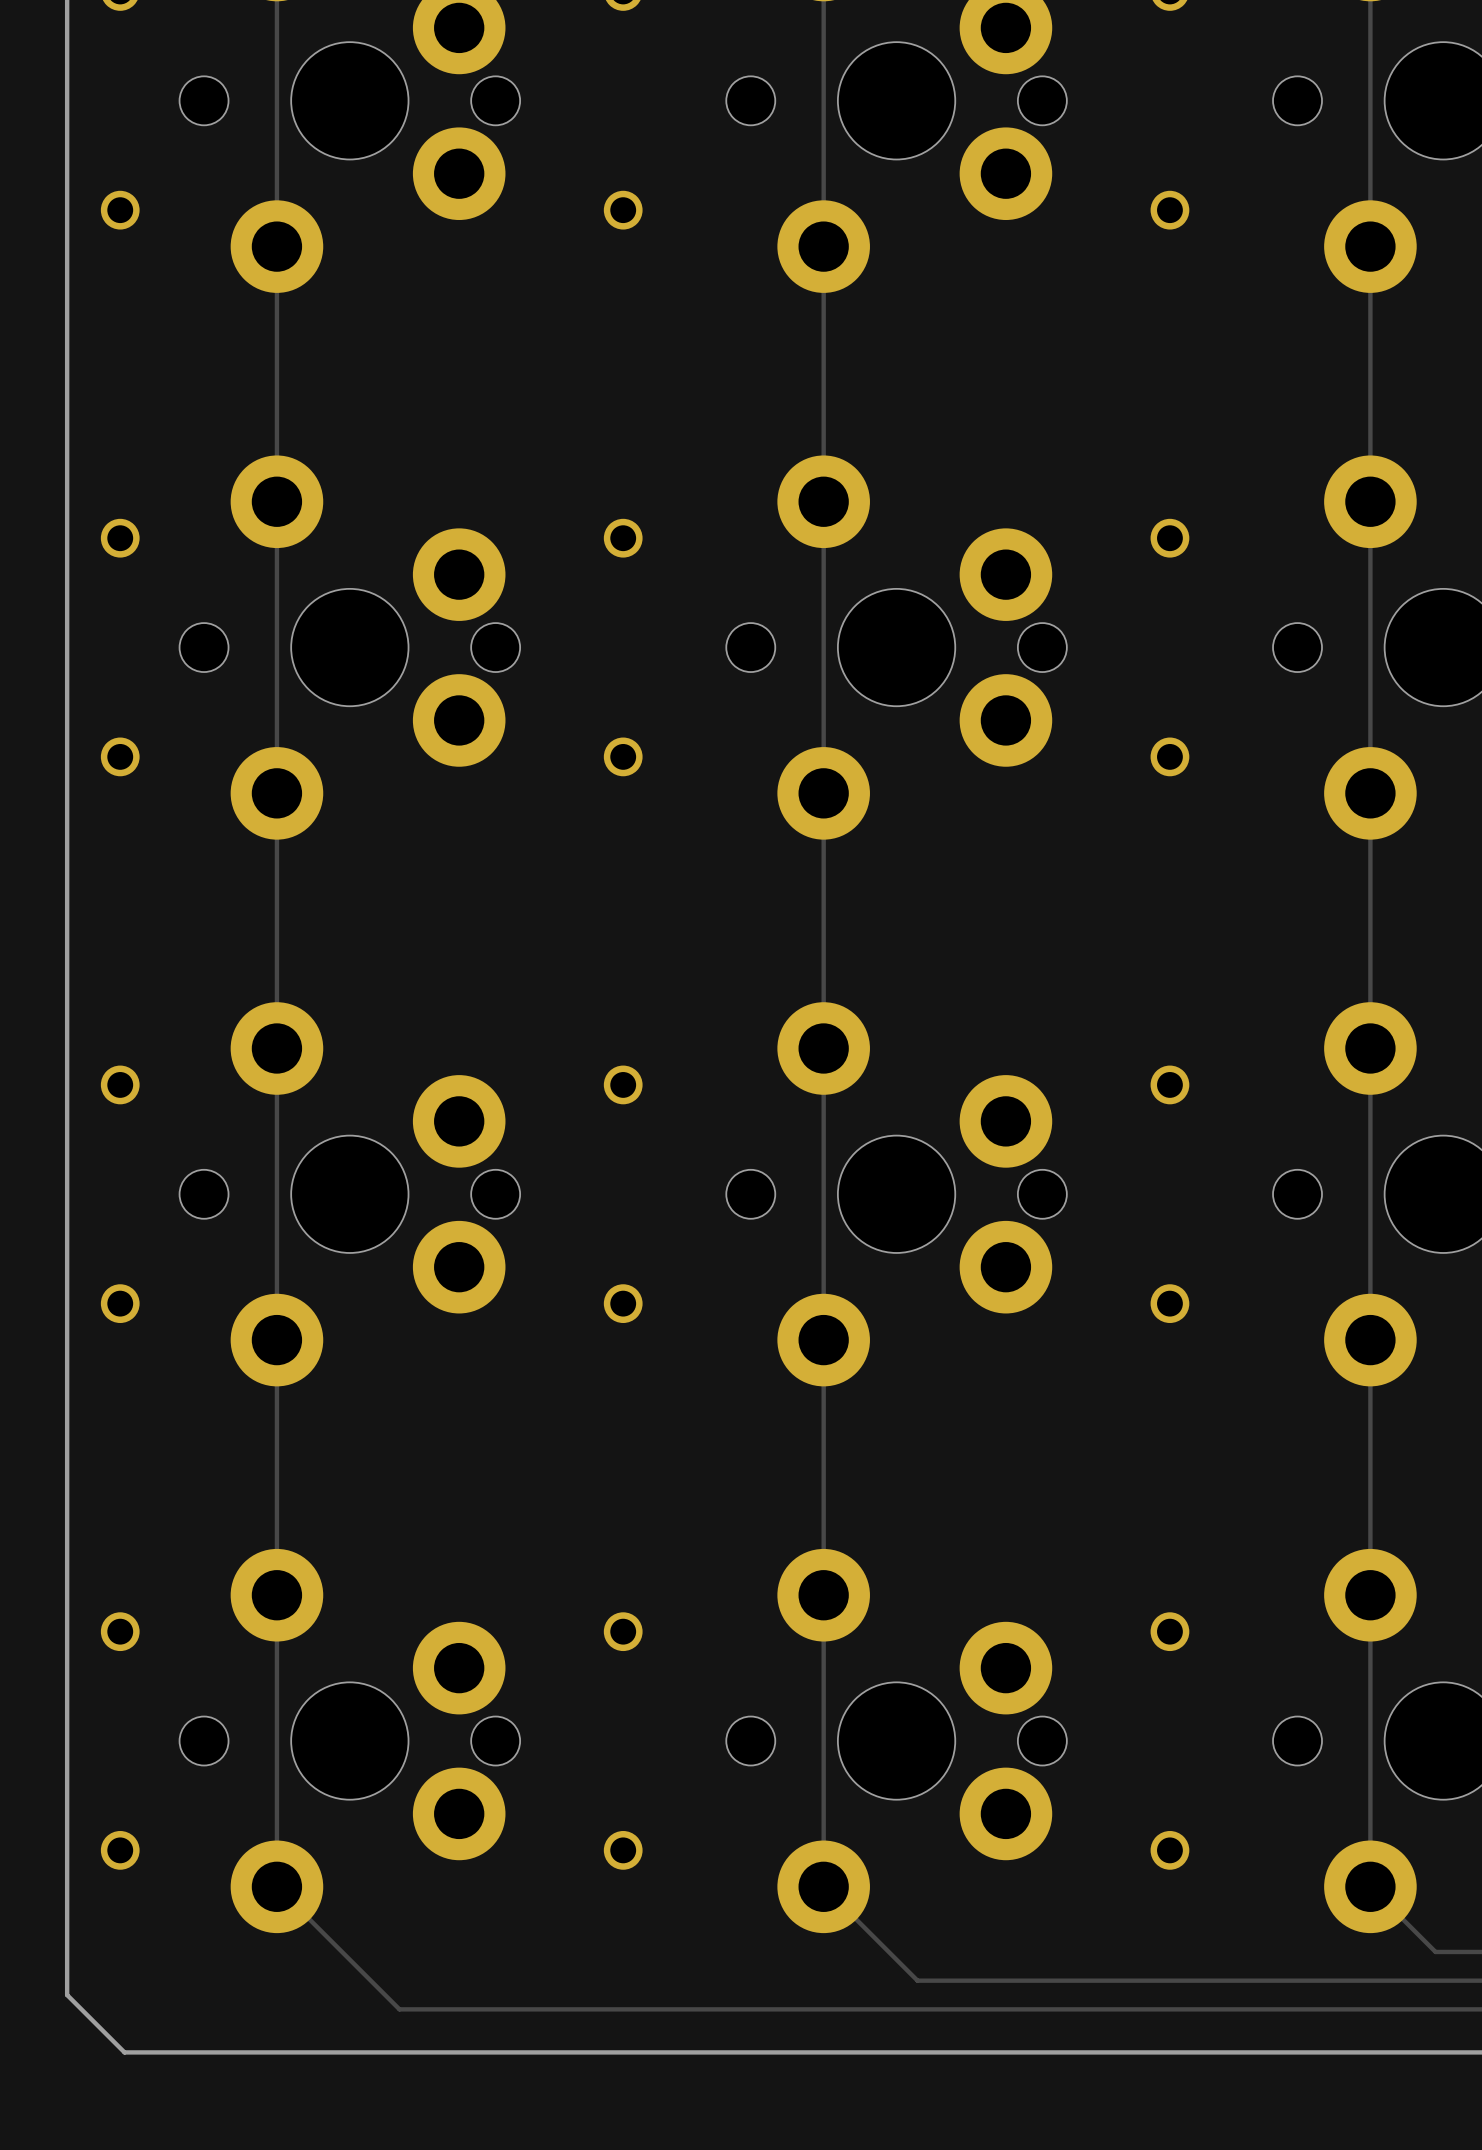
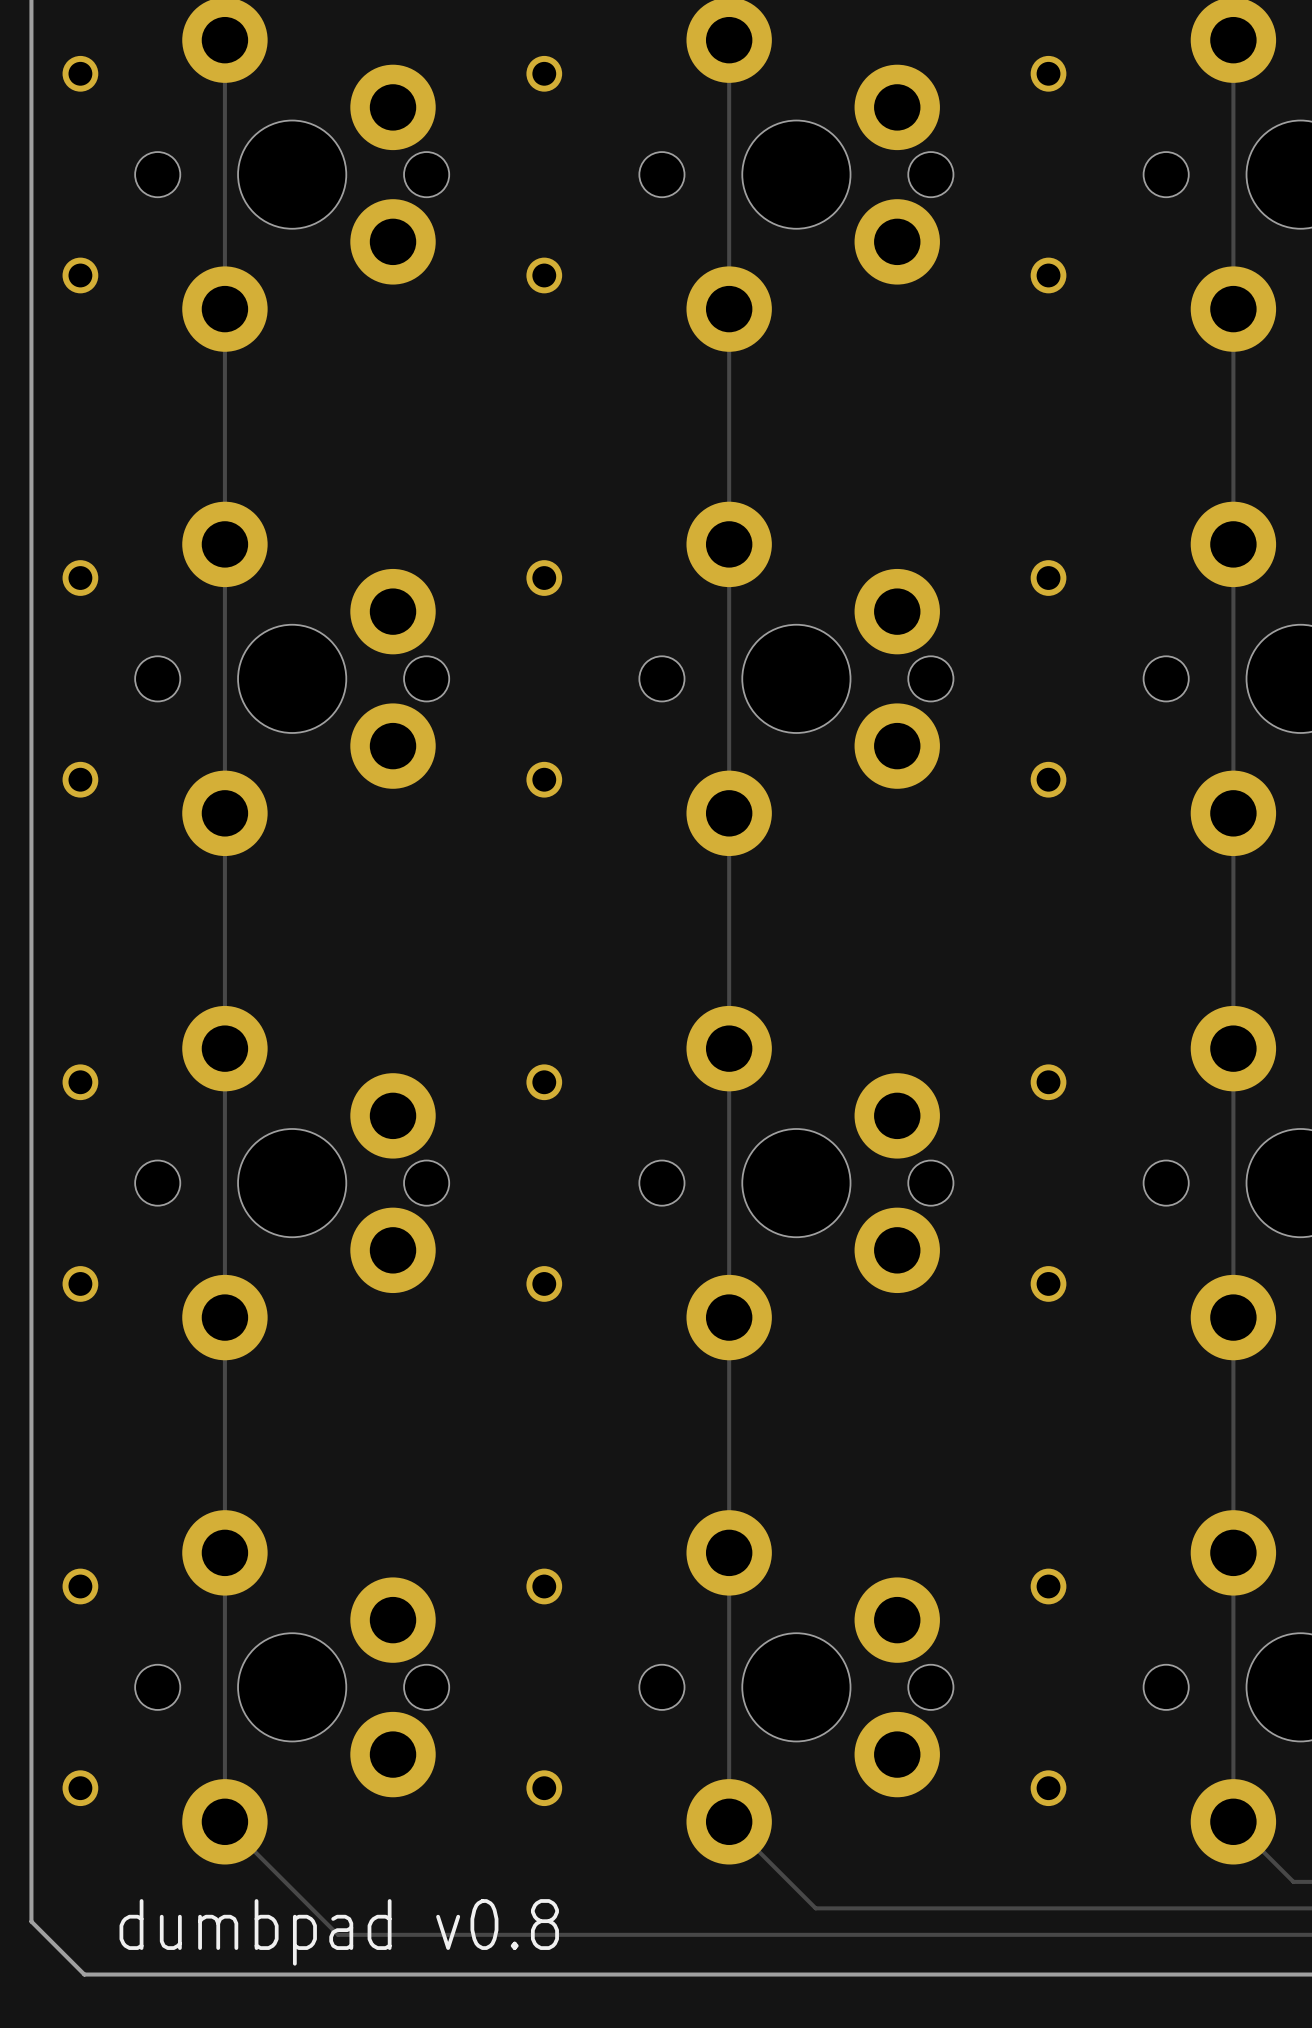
text: none -> dumbpad v0.8 (339, 1932)

